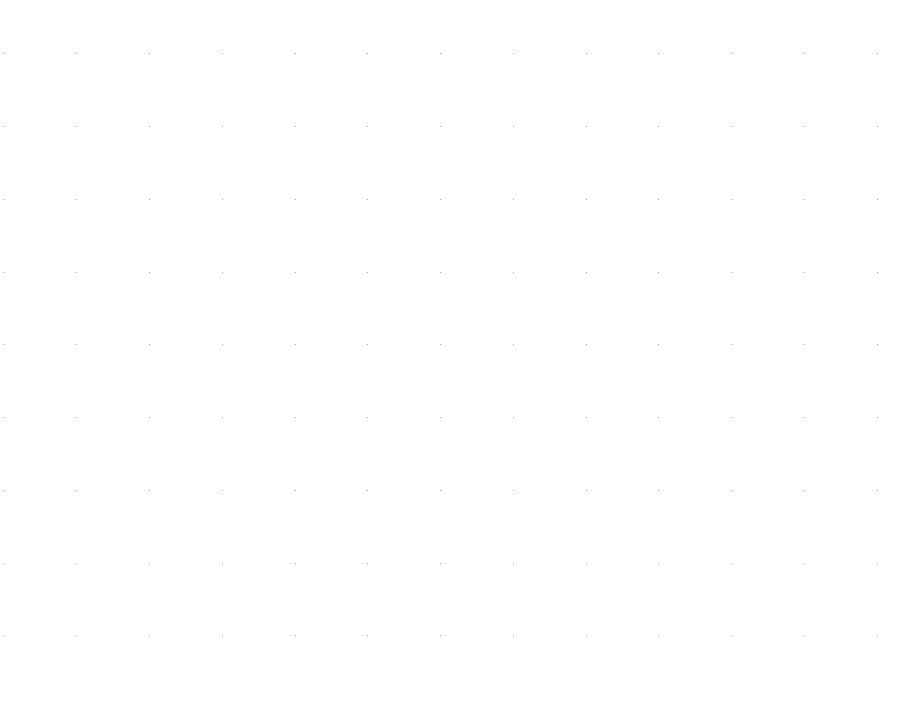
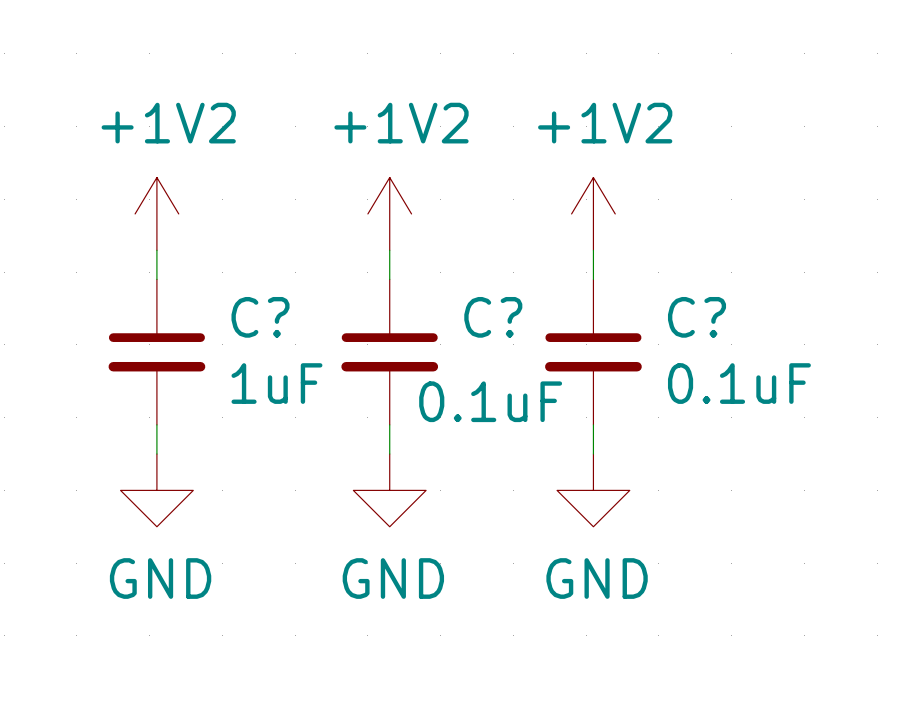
power symbol: none -> +1V2 (156, 213)
power symbol: none -> +1V2 (389, 213)
power symbol: none -> +1V2 (593, 213)
wire: none -> (156, 250) (156, 279)
wire: none -> (389, 250) (389, 279)
wire: none -> (593, 250) (593, 279)
C?: none -> 1uF (156, 352)
C?: none -> 0.1uF (389, 352)
C?: none -> 0.1uF (593, 352)
wire: none -> (156, 424) (156, 454)
wire: none -> (389, 424) (389, 454)
wire: none -> (593, 424) (593, 454)
power symbol: none -> GND (156, 490)
power symbol: none -> GND (389, 490)
power symbol: none -> GND (593, 490)

